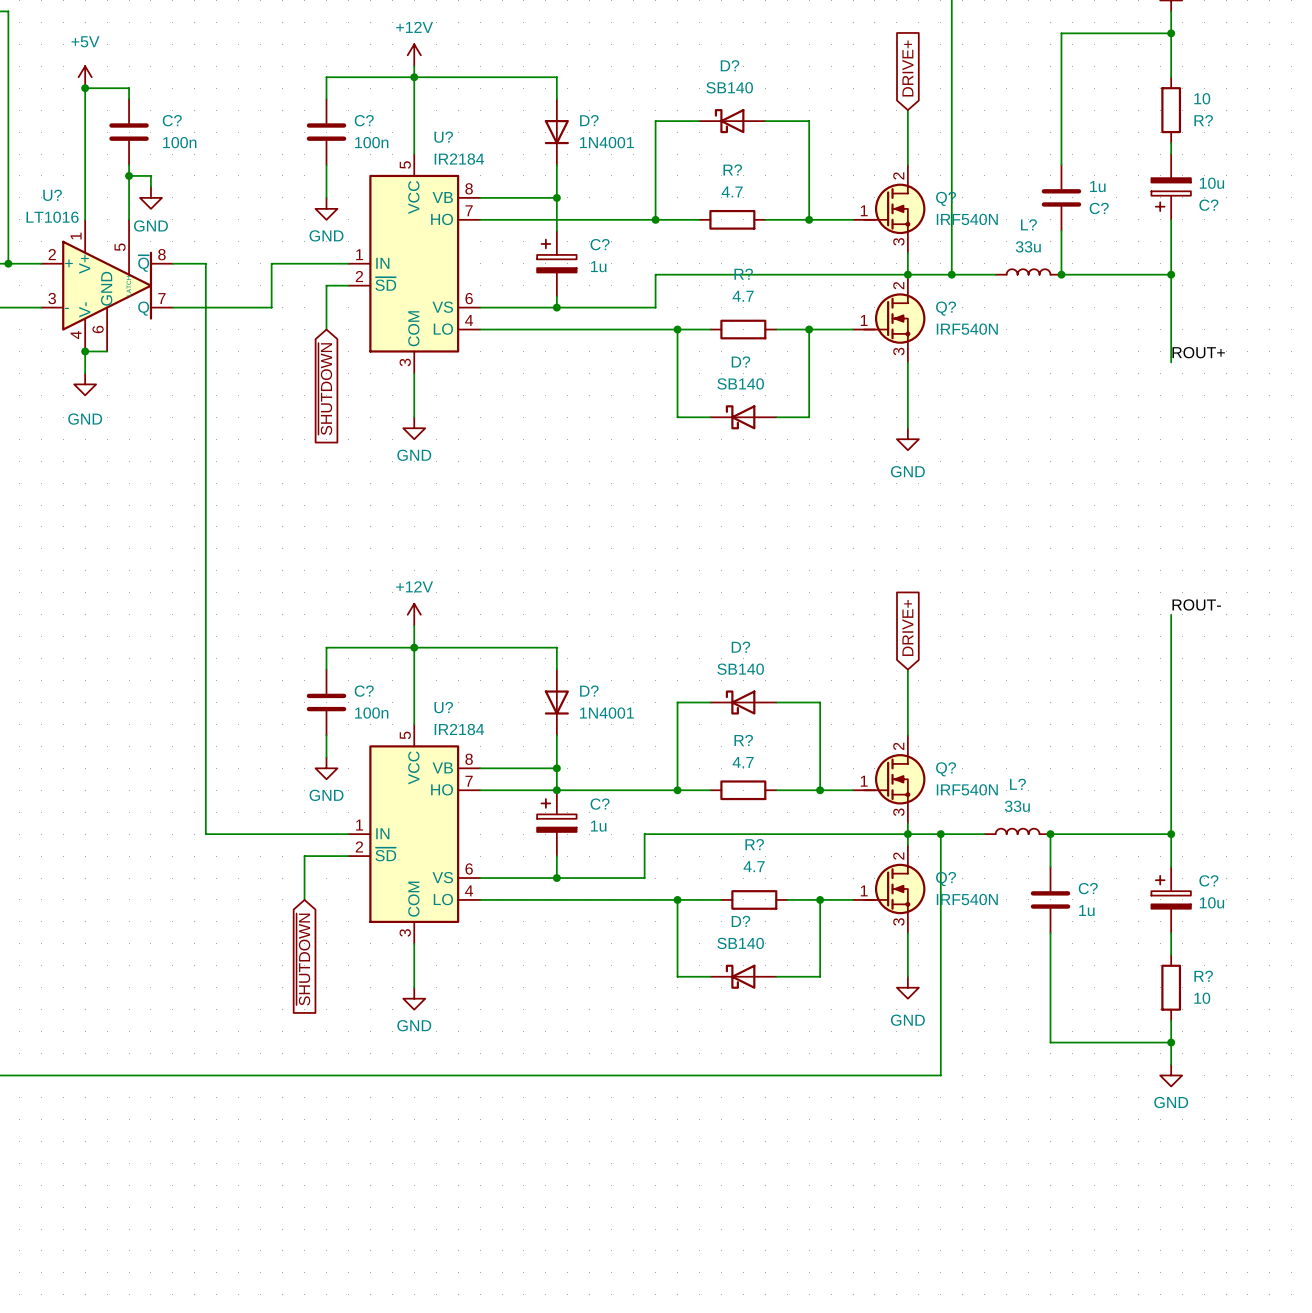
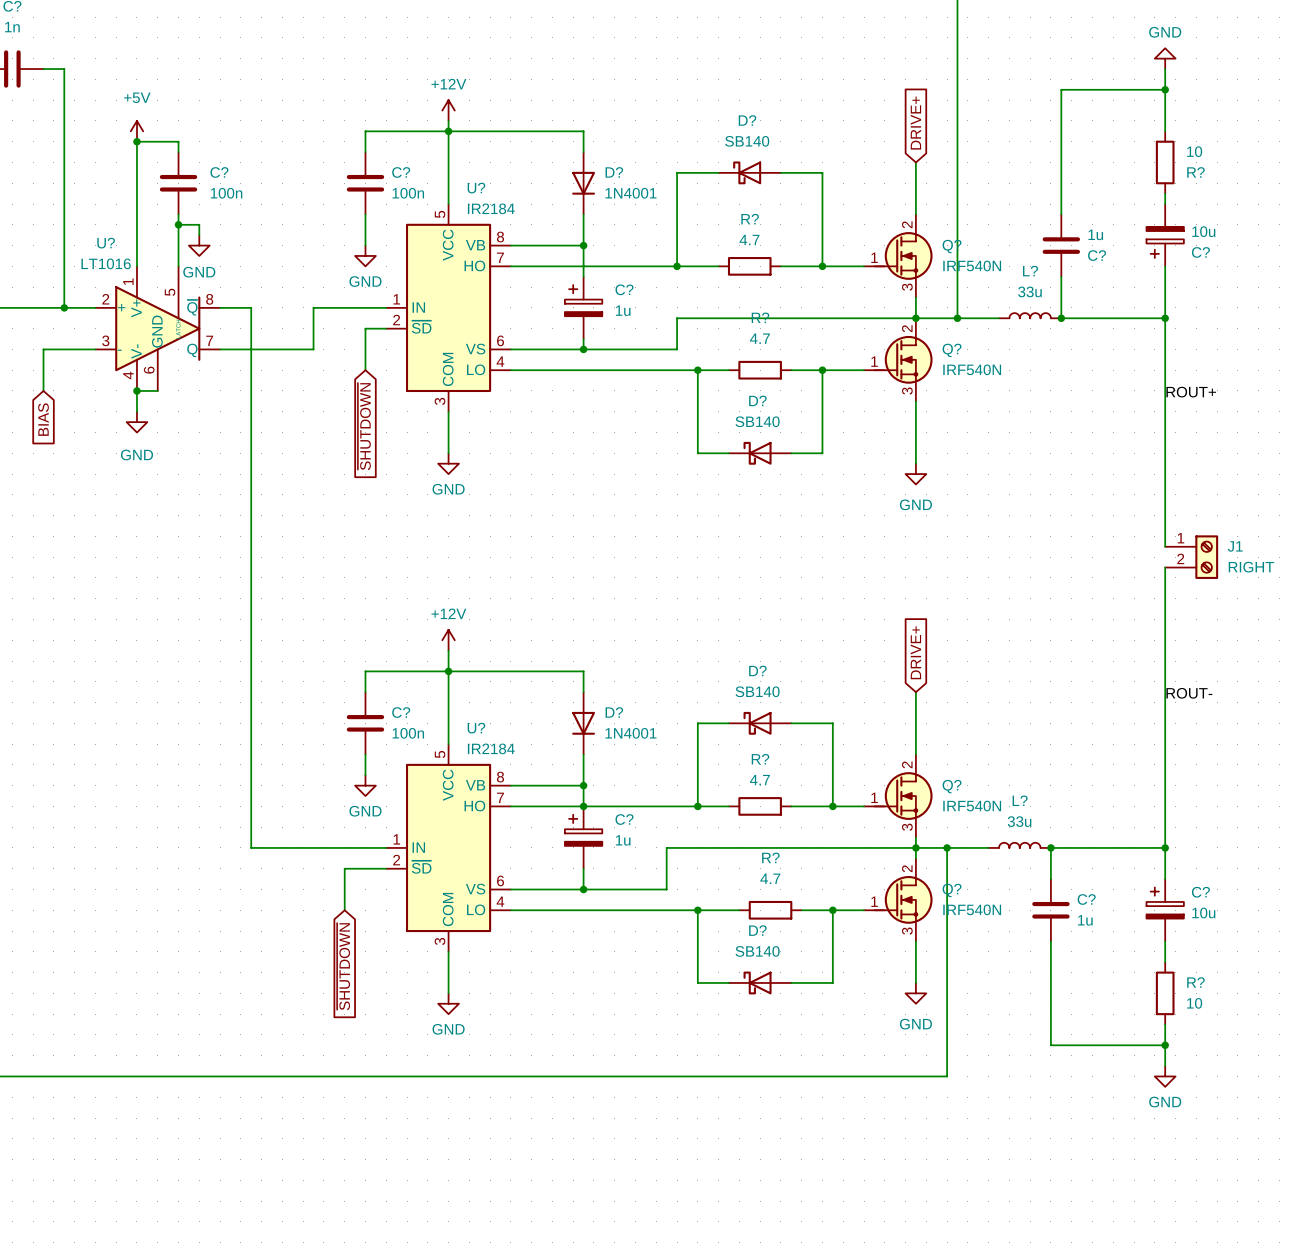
wire: none -> (1165, 401) (1165, 546)
J1: none -> RIGHT (1191, 557)
wire: none -> (1165, 567) (1165, 640)
label position: ROUT- (1196, 604) -> ROUT- (1189, 693)

